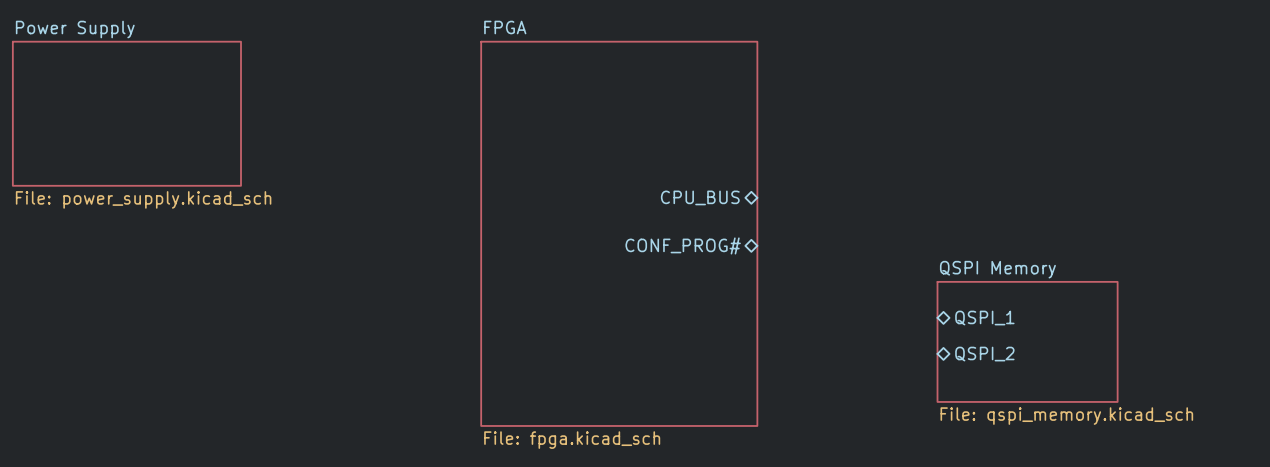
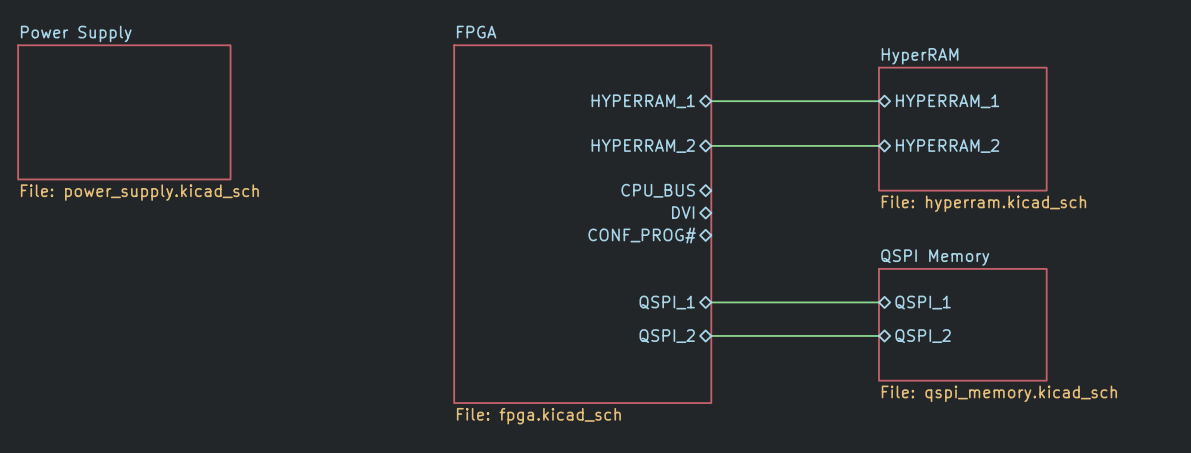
sheet pin: none -> HYPERRAM_1 (643, 101)
wire: none -> (711, 101) (878, 101)
sheet pin: none -> HYPERRAM_1 (947, 101)
sheet HyperRAM: none -> File: hyperram.kicad_sch (962, 129)
sheet pin: none -> HYPERRAM_2 (643, 146)
wire: none -> (711, 145) (878, 145)
sheet pin: none -> HYPERRAM_2 (947, 146)
sheet pin: none -> DVI (683, 212)
wire: none -> (711, 302) (878, 302)
sheet pin: none -> QSPI_1 (667, 302)
wire: none -> (711, 335) (878, 335)
sheet pin: none -> QSPI_2 (667, 336)

